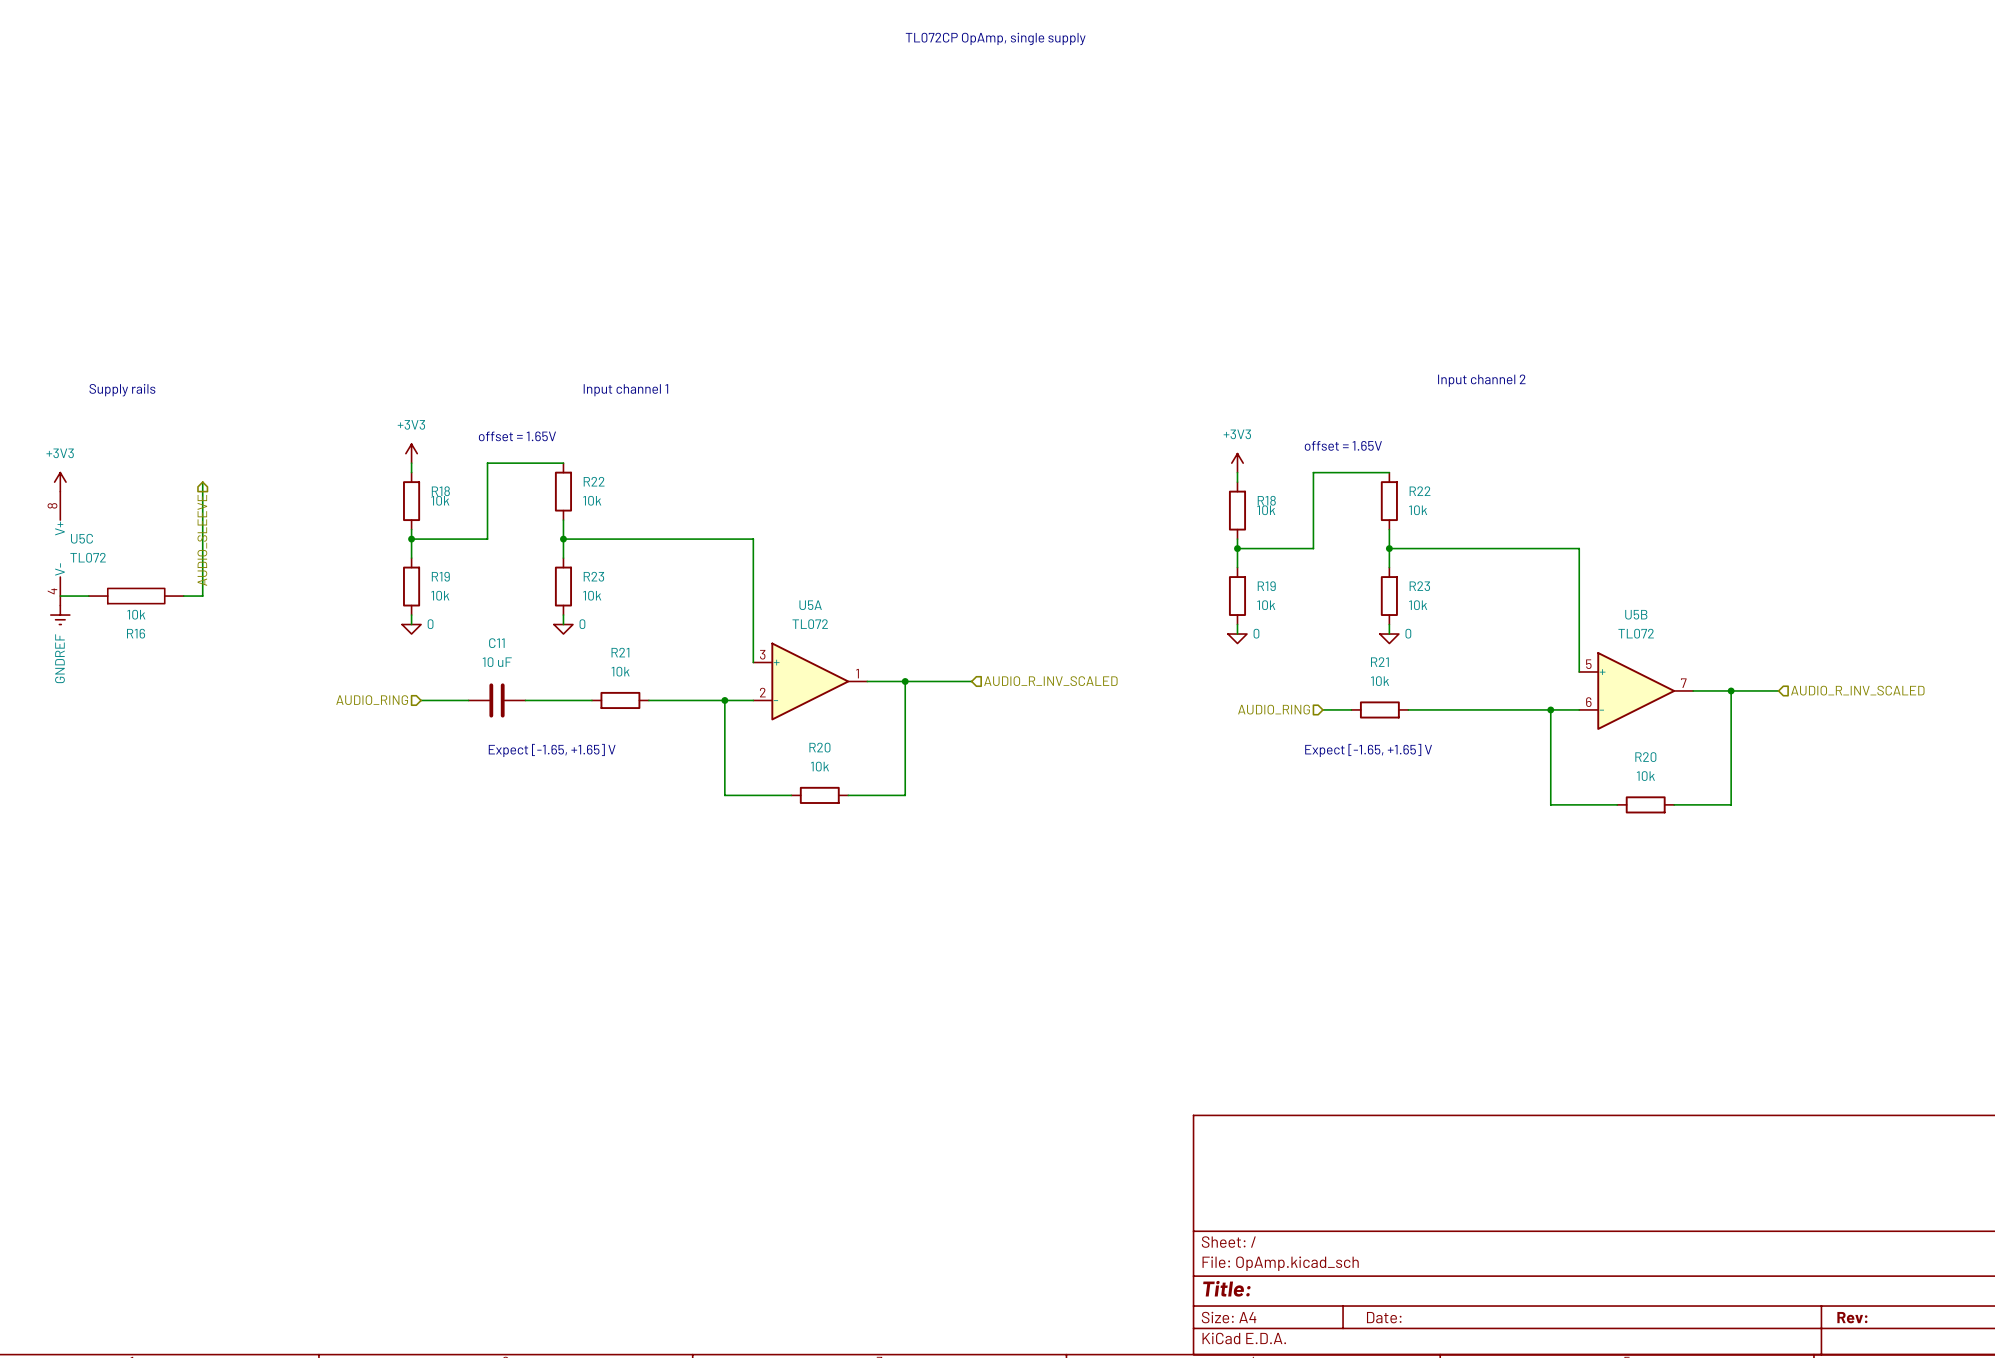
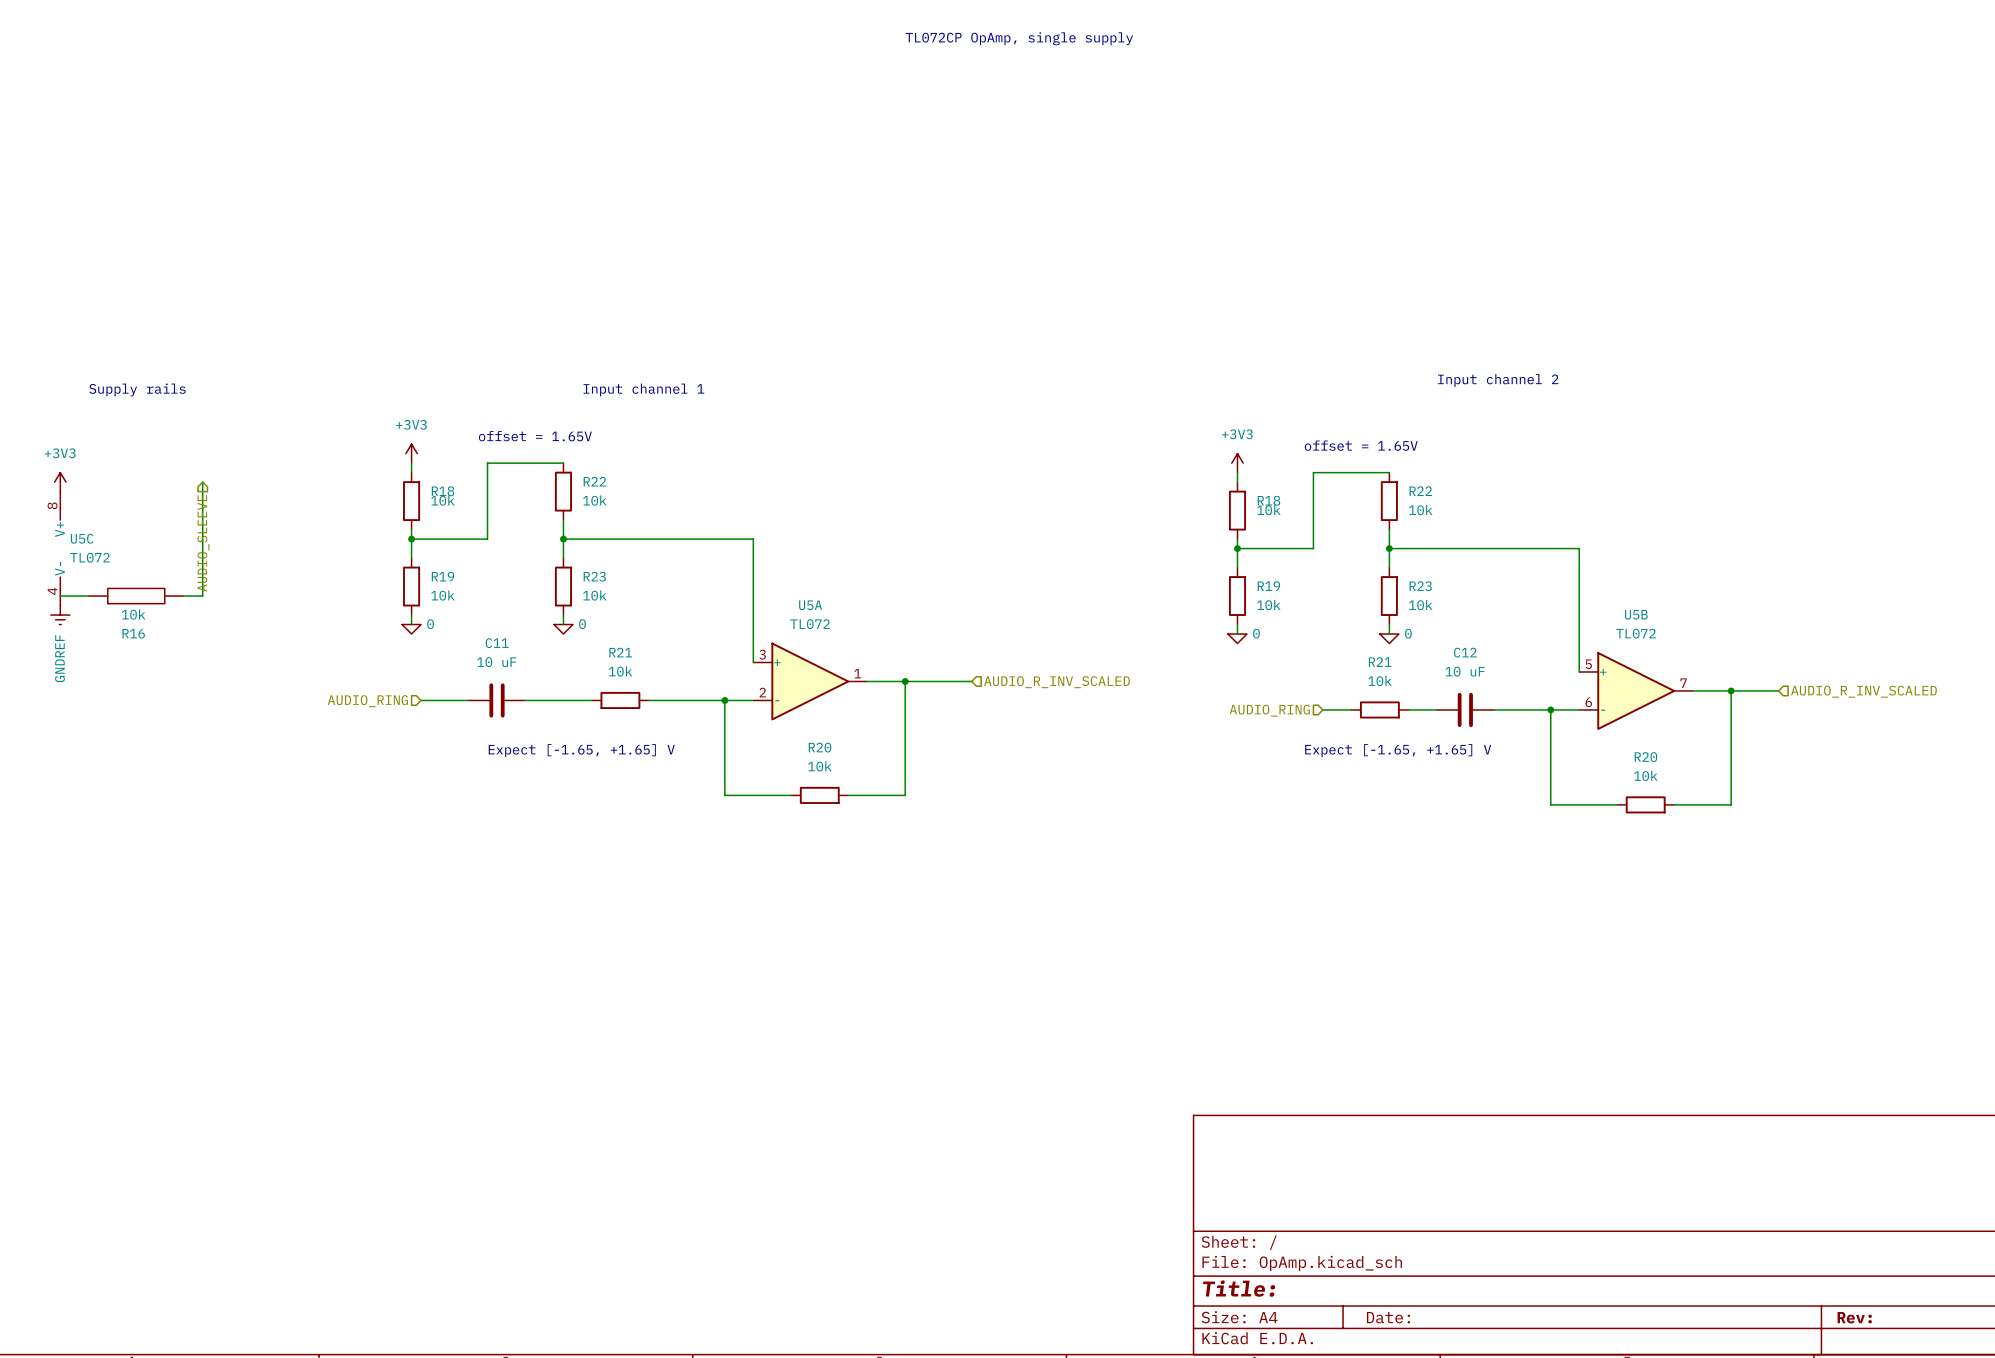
C12: none -> 10 uF (1465, 709)

